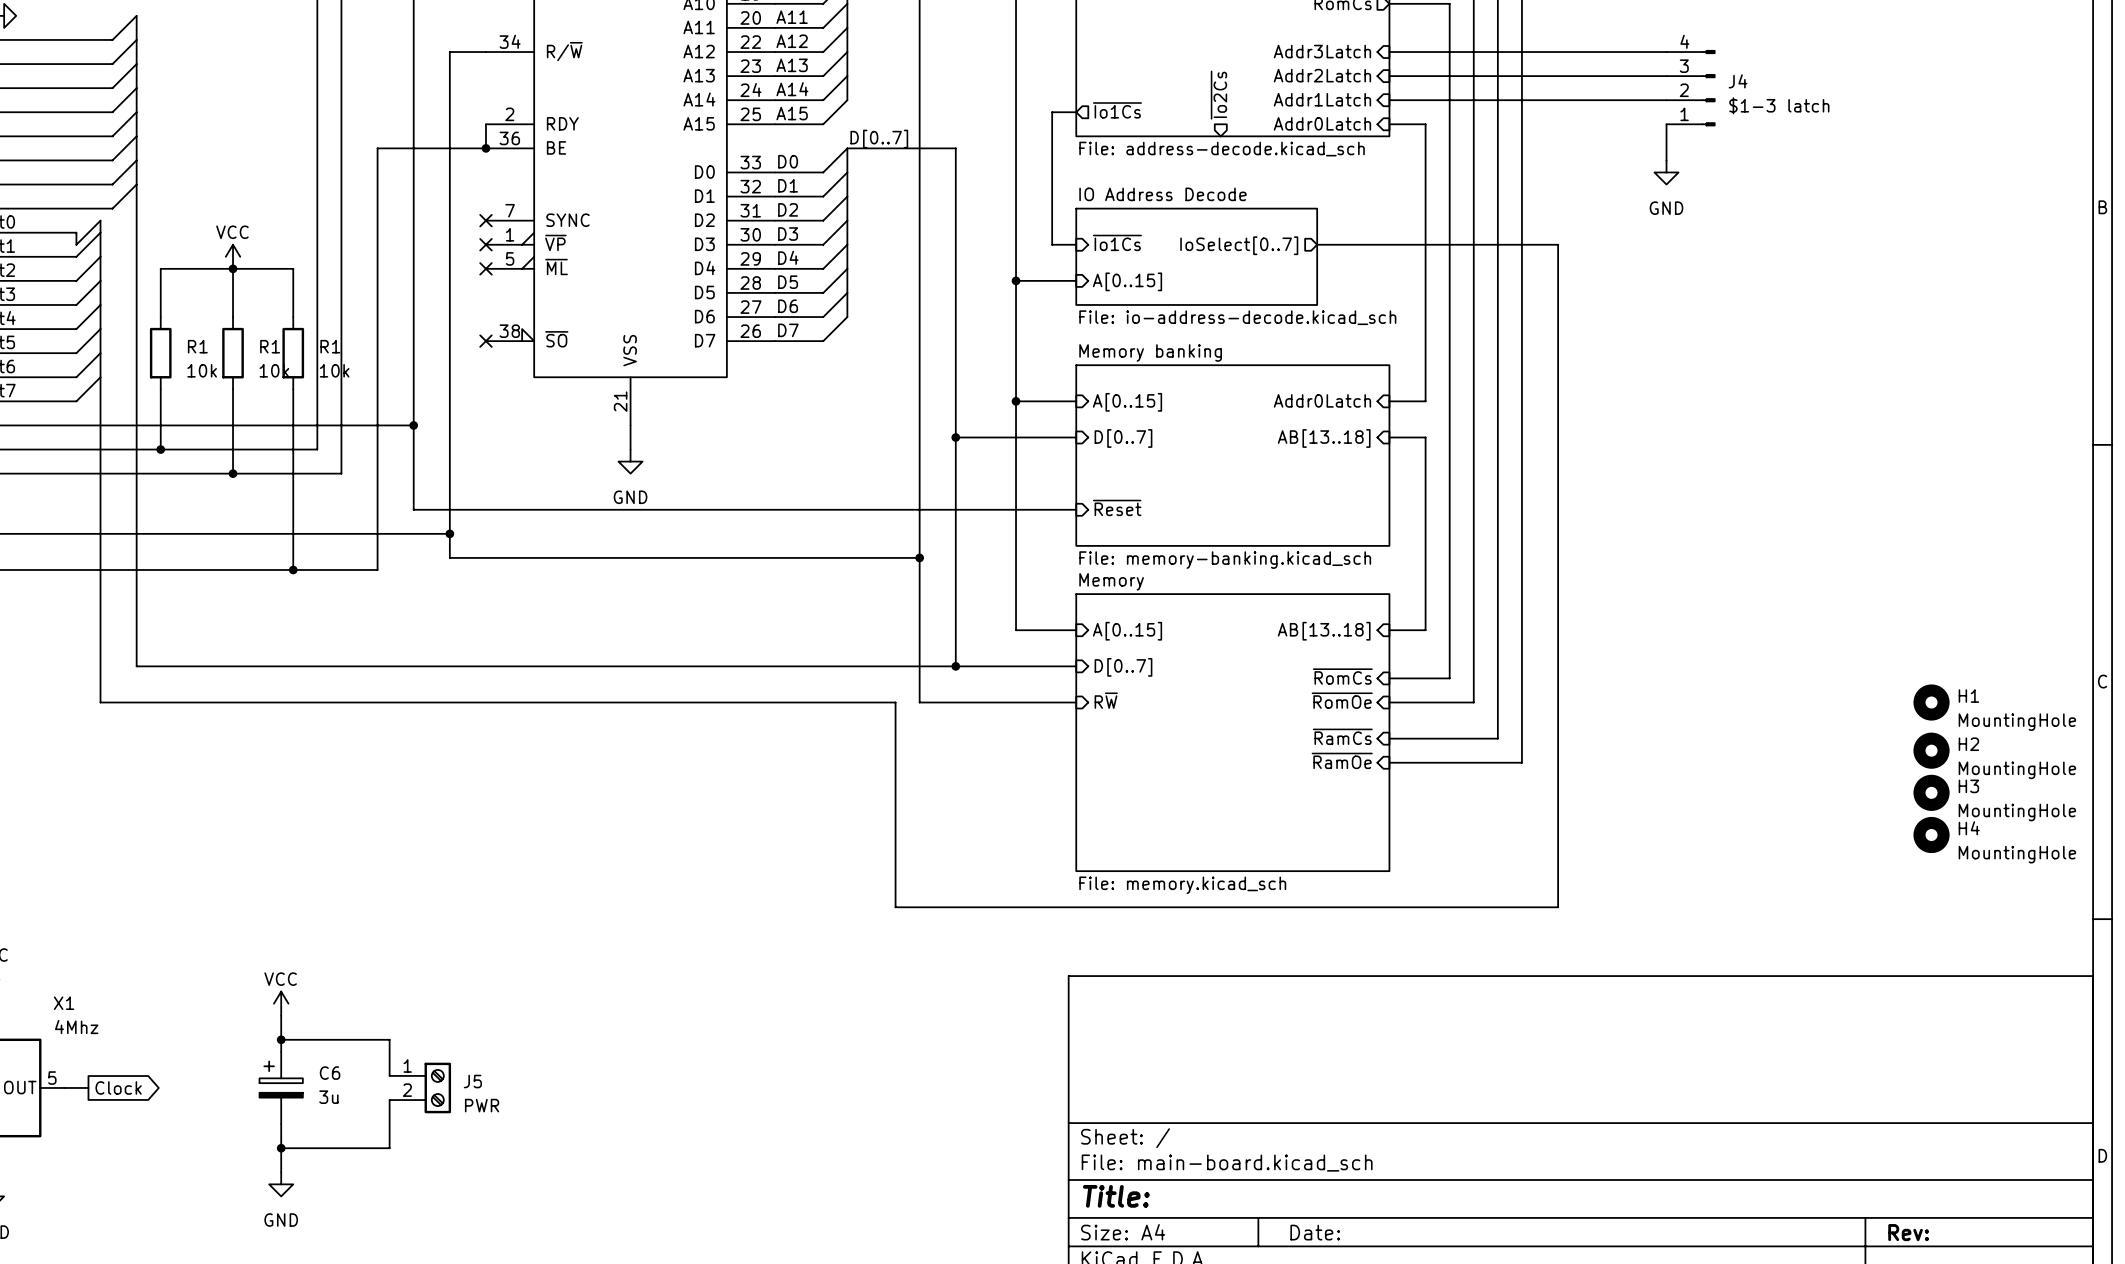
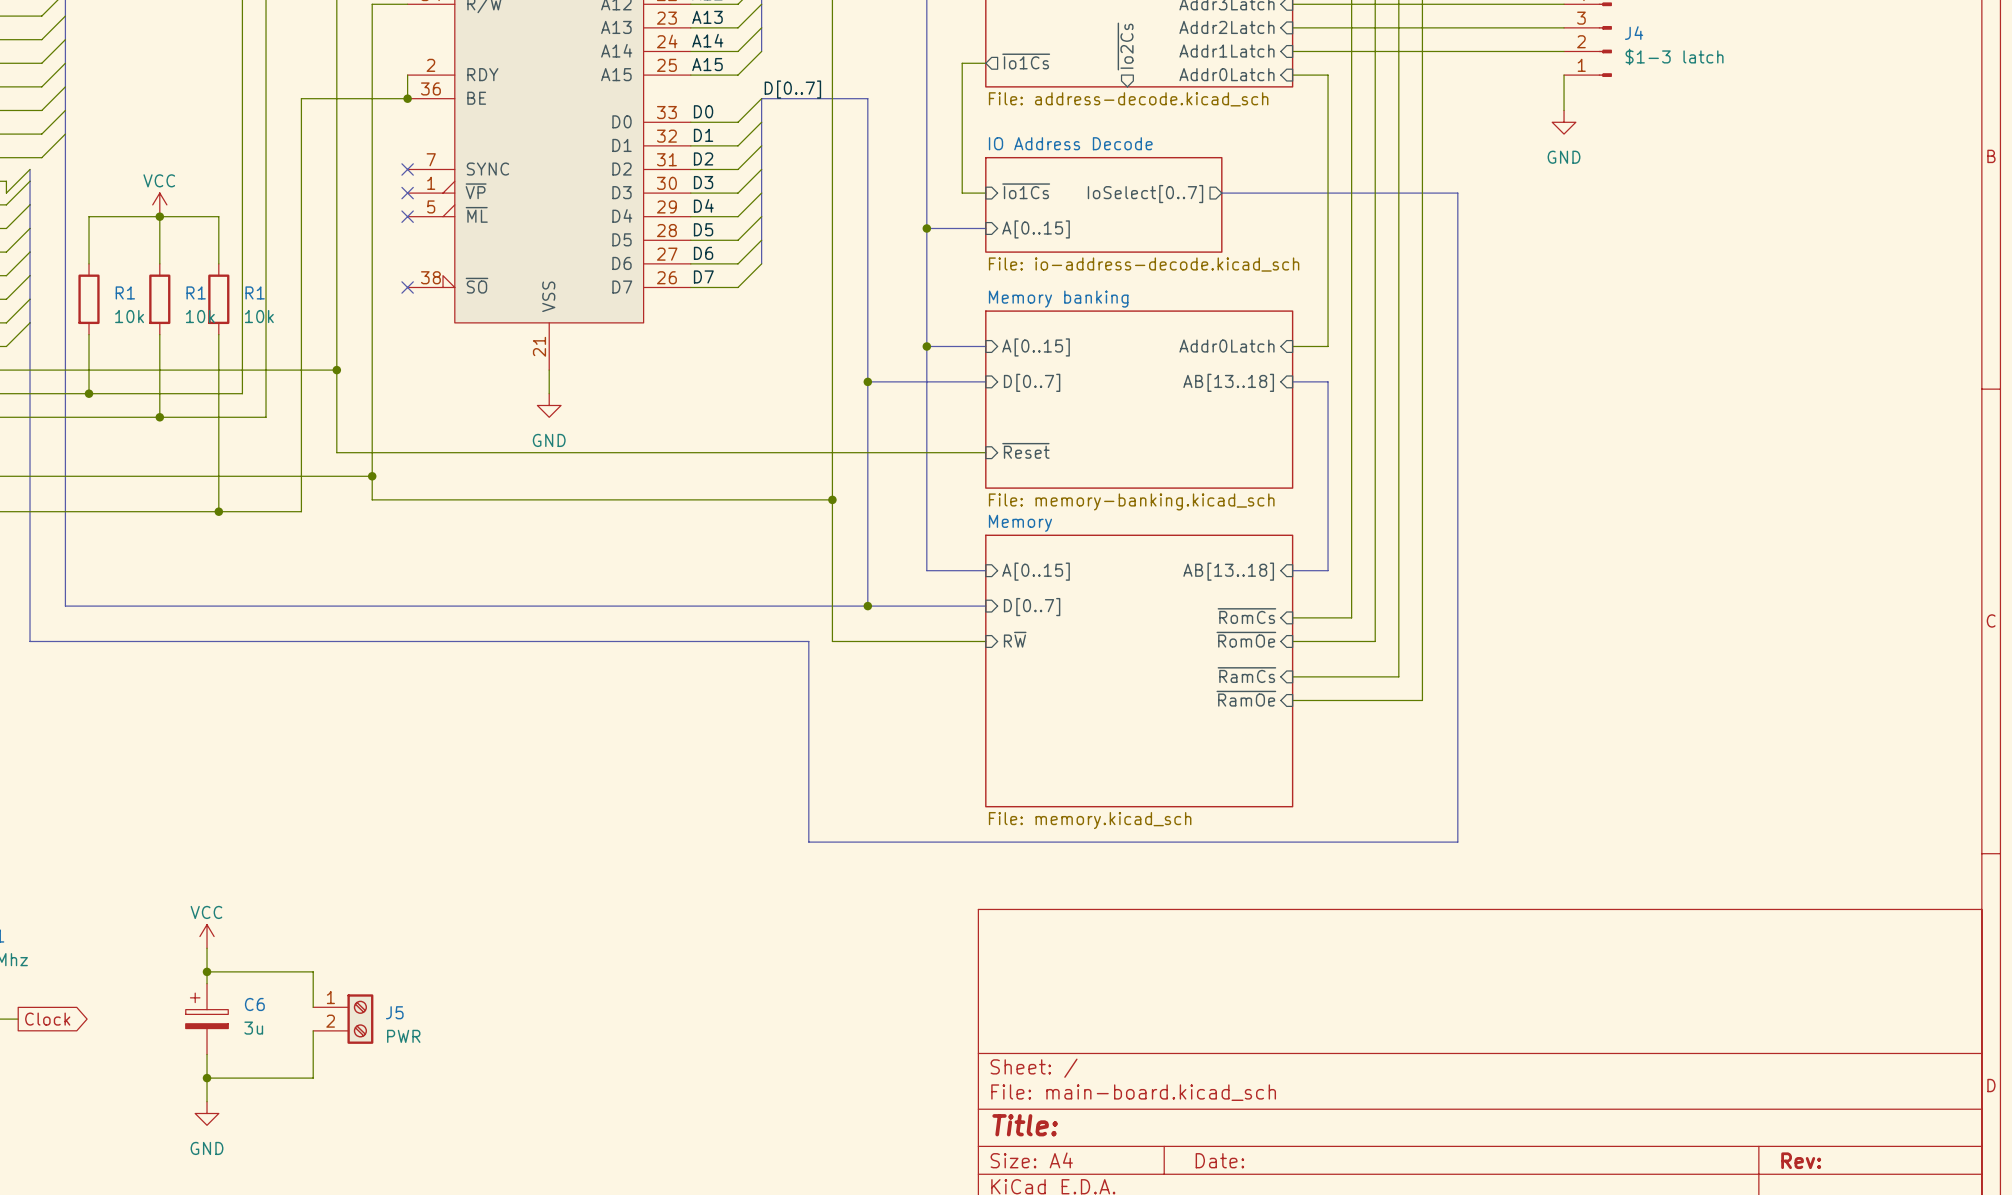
H1: MountingHole (1931, 702) -> none
H2: MountingHole (1931, 750) -> none
H3: MountingHole (1931, 792) -> none
H4: MountingHole (1931, 835) -> none

